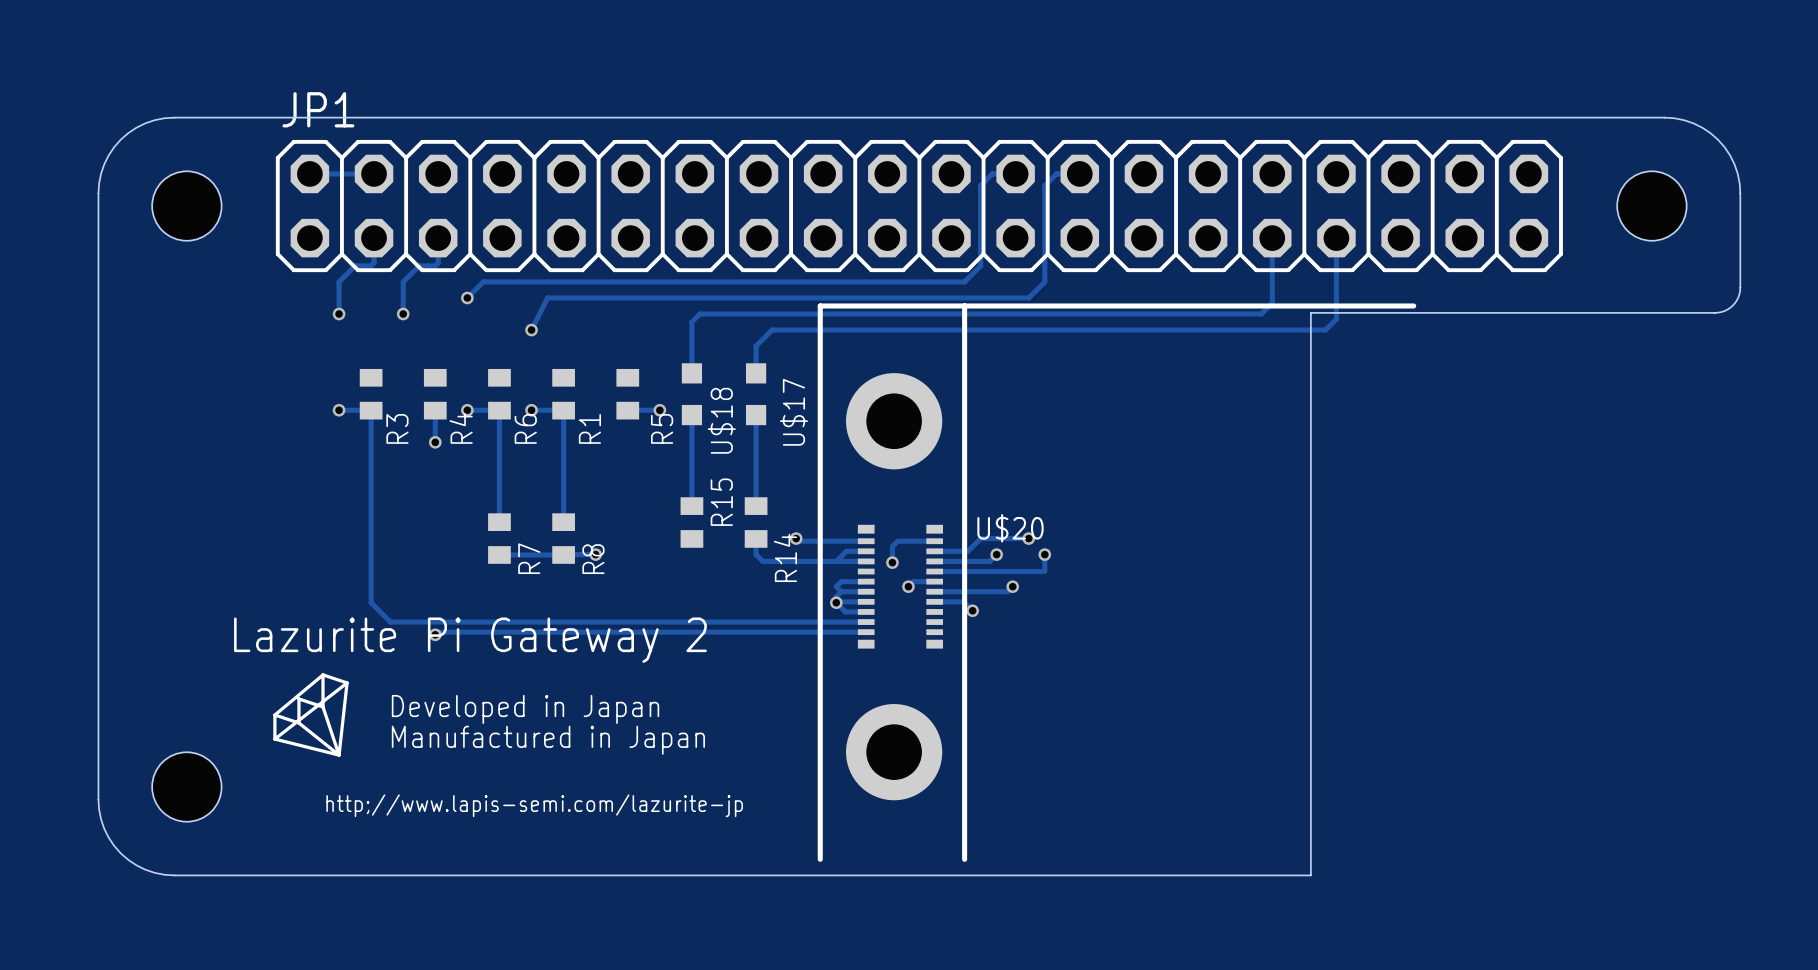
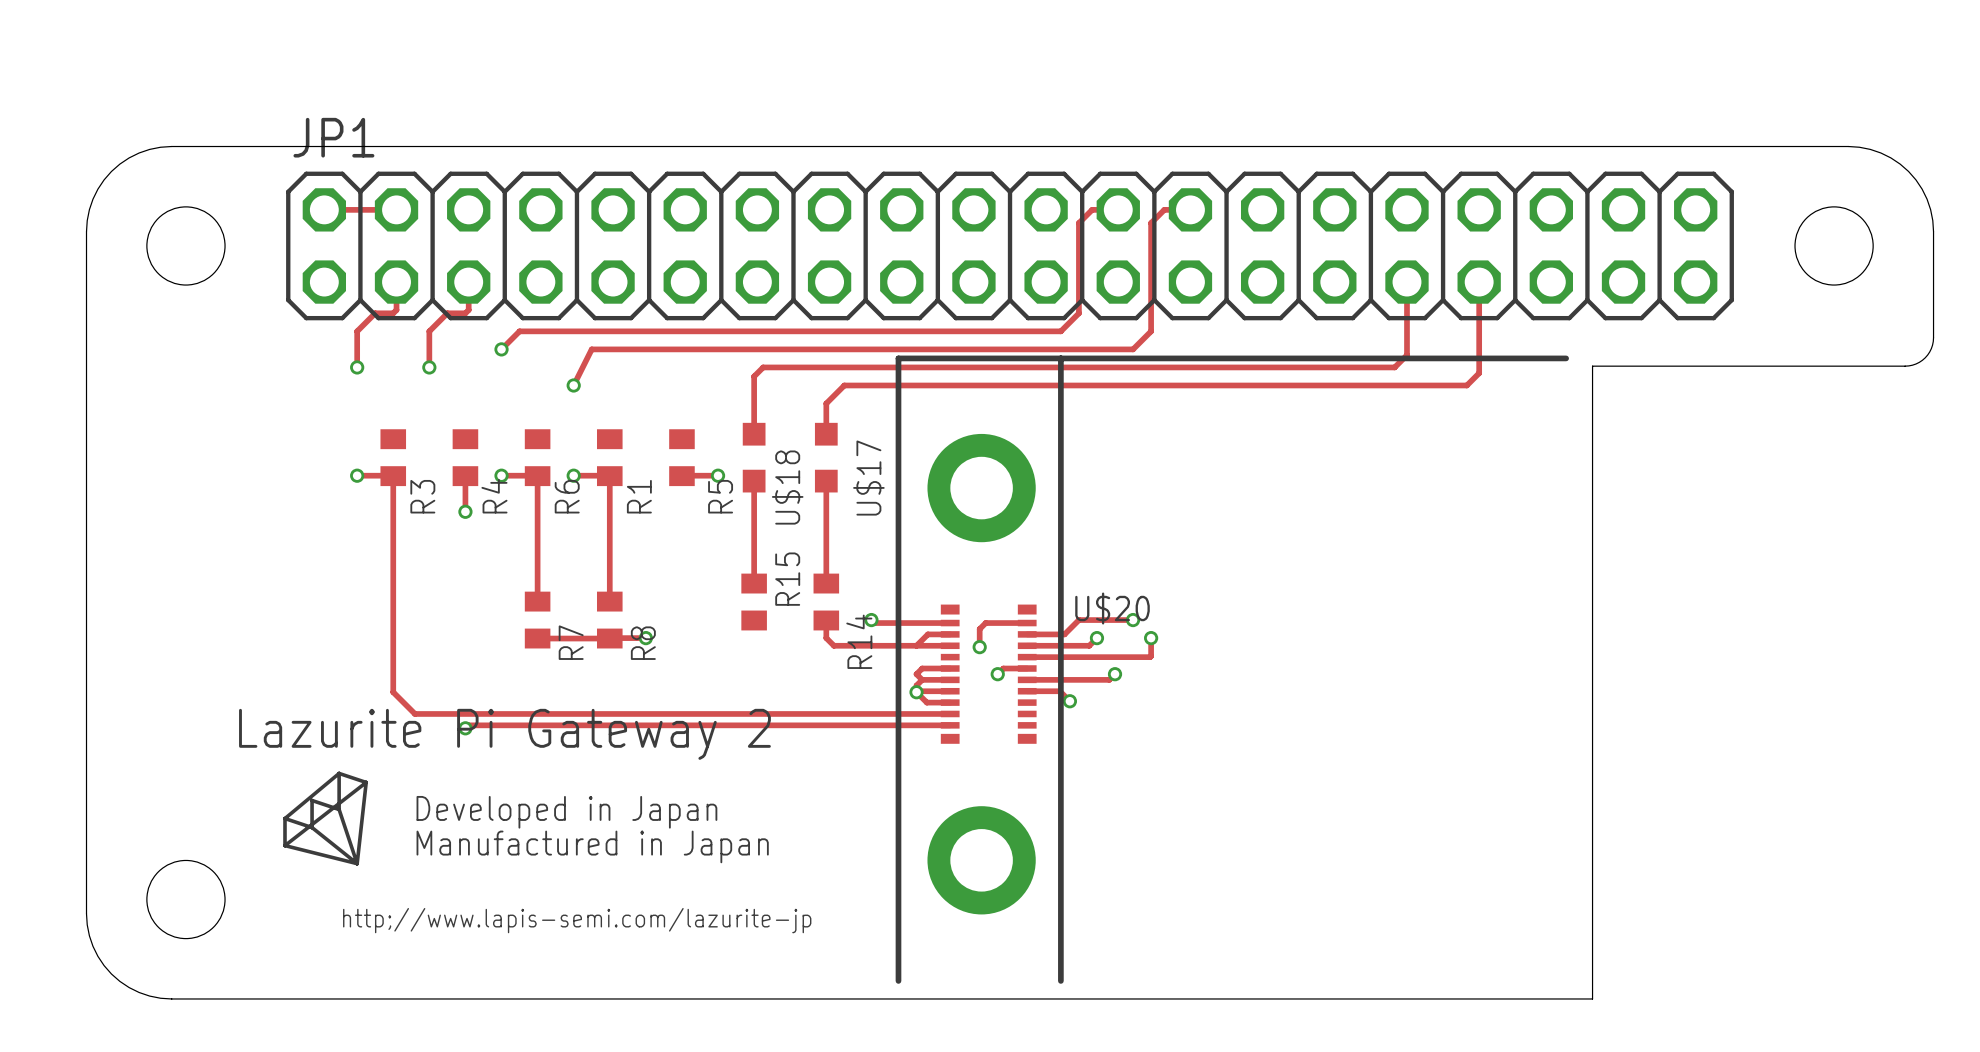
board edge: (1437, 312) (1310, 312) (1310, 875) -> (1592, 366) (1592, 998) (1450, 998)

